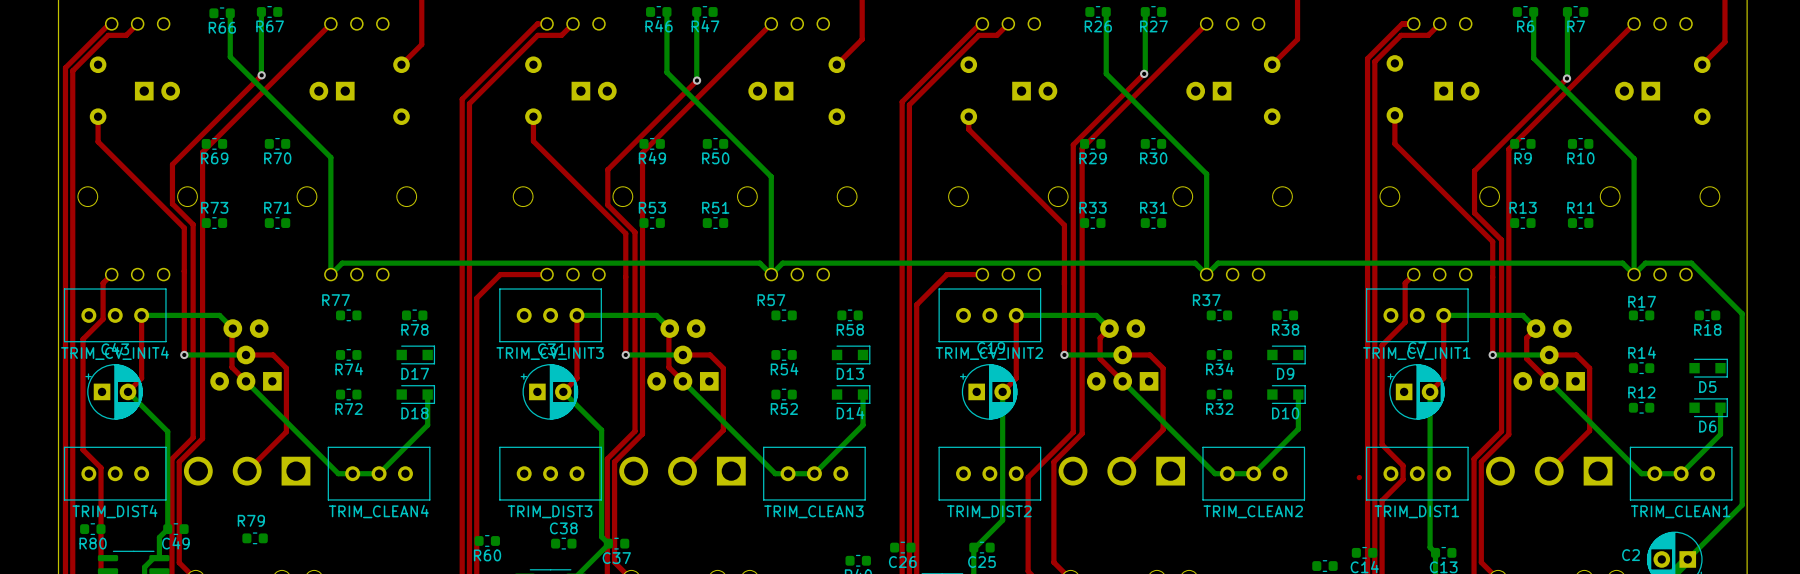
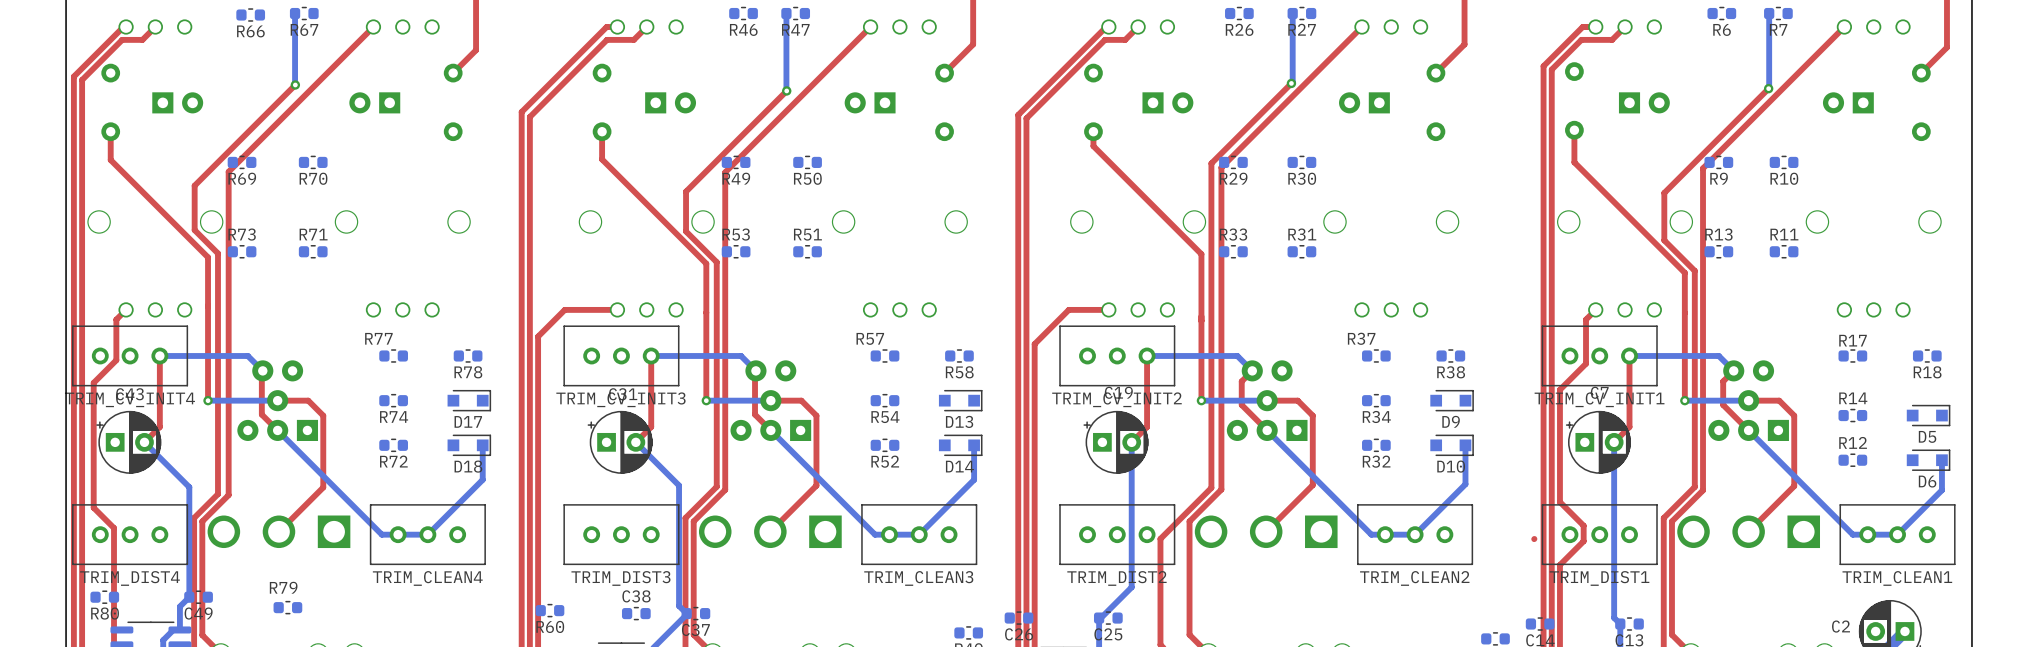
bottom track: (666, 11) (666, 72) (771, 176) (771, 274) -> none
bottom track: (1106, 11) (1106, 73) (1206, 174) (1206, 274) -> none
bottom track: (1533, 11) (1533, 58) (1634, 158) (1634, 274) -> none
bottom track: (230, 13) (230, 56) (330, 157) (330, 274) (342, 263) (759, 263) (771, 274) -> none
bottom track: (1206, 274) (1195, 263) (782, 263) (771, 274) -> none
bottom track: (1634, 274) (1645, 263) (1691, 263) (1742, 313) (1742, 505) (1687, 559) -> none
bottom track: (1634, 274) (1622, 263) (1218, 263) (1206, 274) -> none

